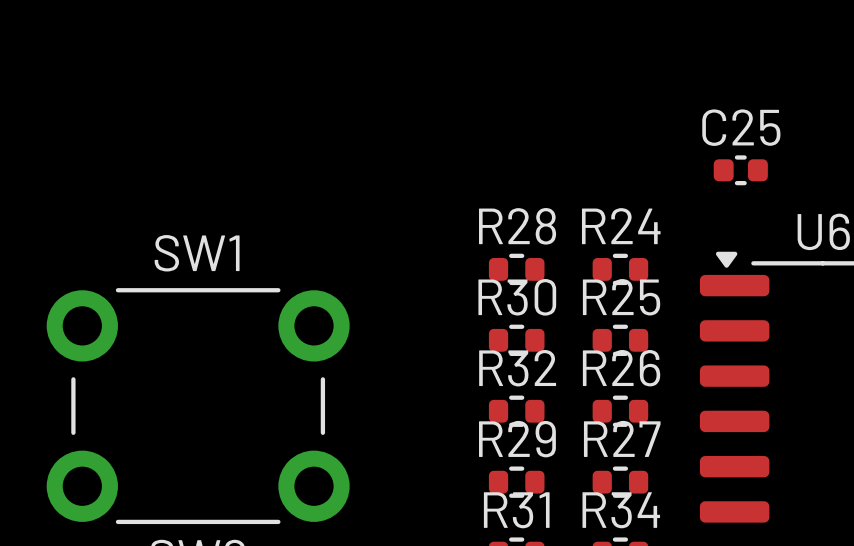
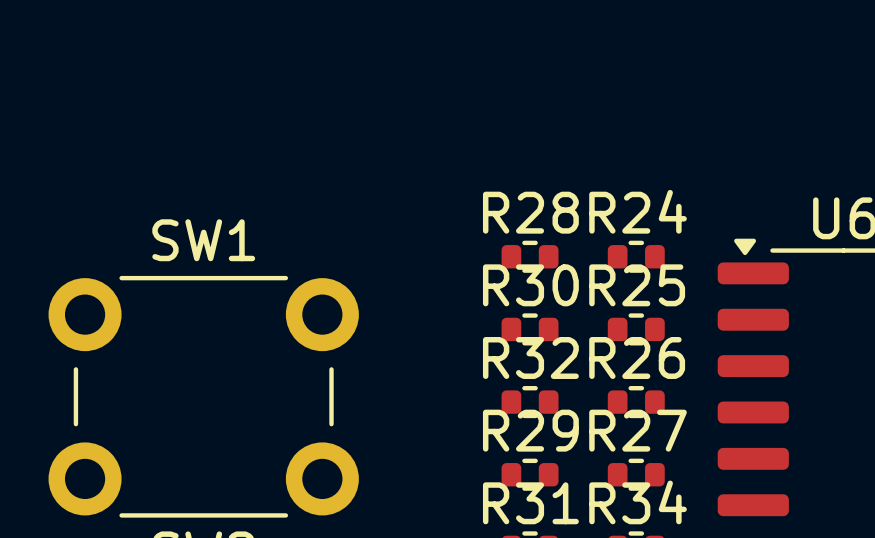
C25: (740, 170) -> none

